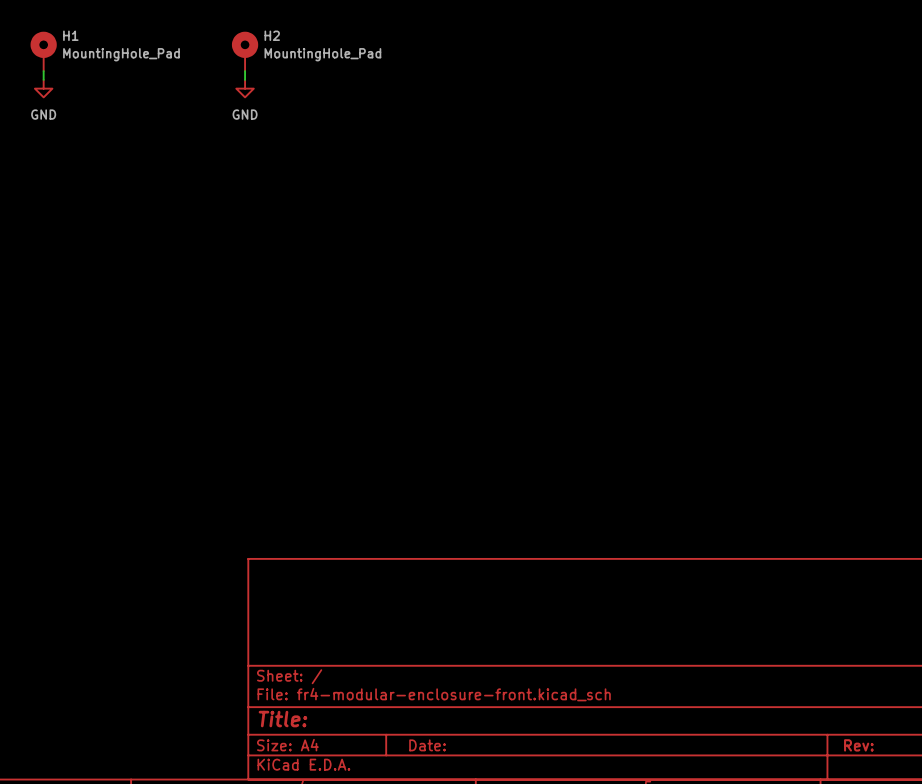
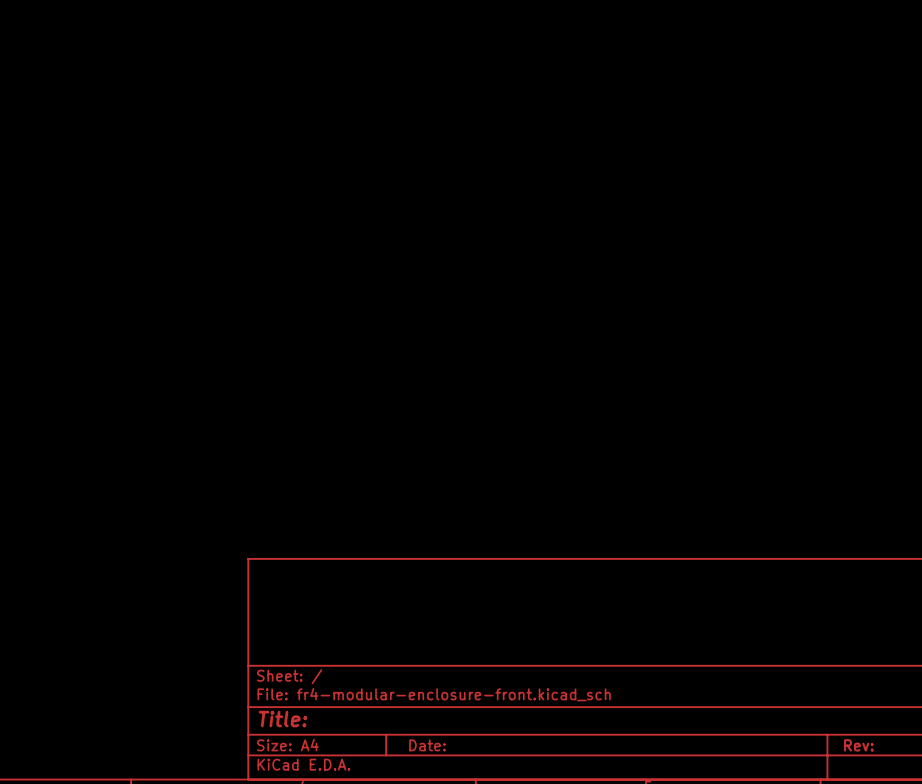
H1: MountingHole_Pad (43, 51) -> none
H2: MountingHole_Pad (245, 51) -> none
wire: (43, 71) (43, 79) -> none
wire: (245, 71) (245, 79) -> none
power symbol: GND (43, 88) -> none
power symbol: GND (245, 88) -> none

